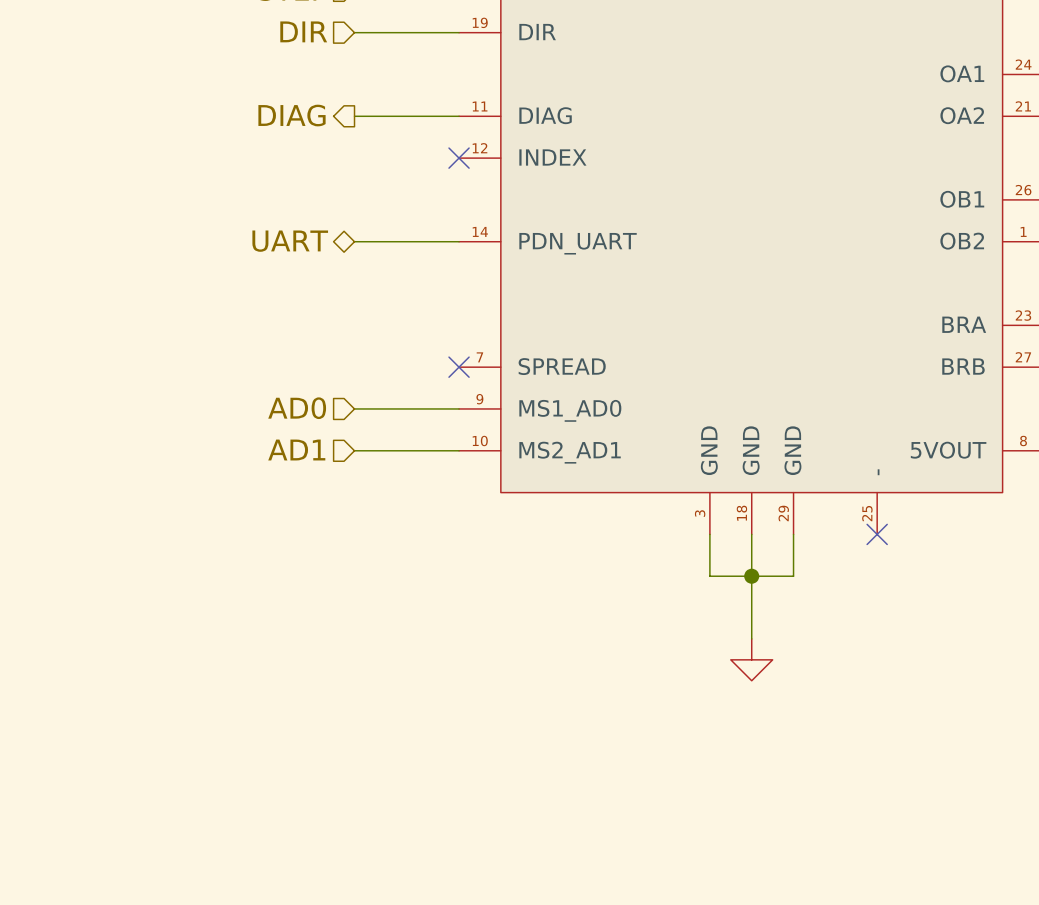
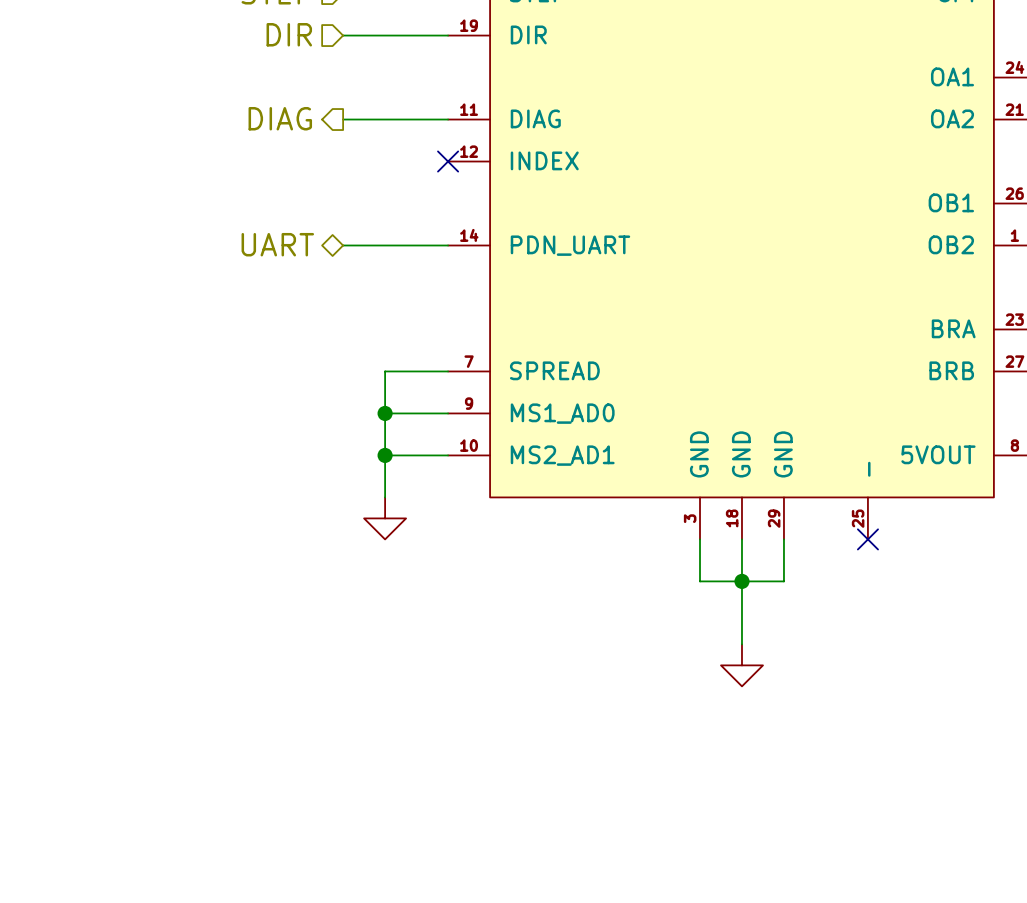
wire: none -> (448, 371) (385, 371) (385, 497)
no-connect mark: (459, 367) -> none
hierarchical label: AD0 (297, 408) -> none
wire: (354, 408) (396, 408) -> none
junction: none -> (385, 413)
hierarchical label: AD1 (296, 450) -> none
wire: (354, 450) (396, 450) -> none
junction: none -> (385, 455)
power symbol: none -> (385, 518)

